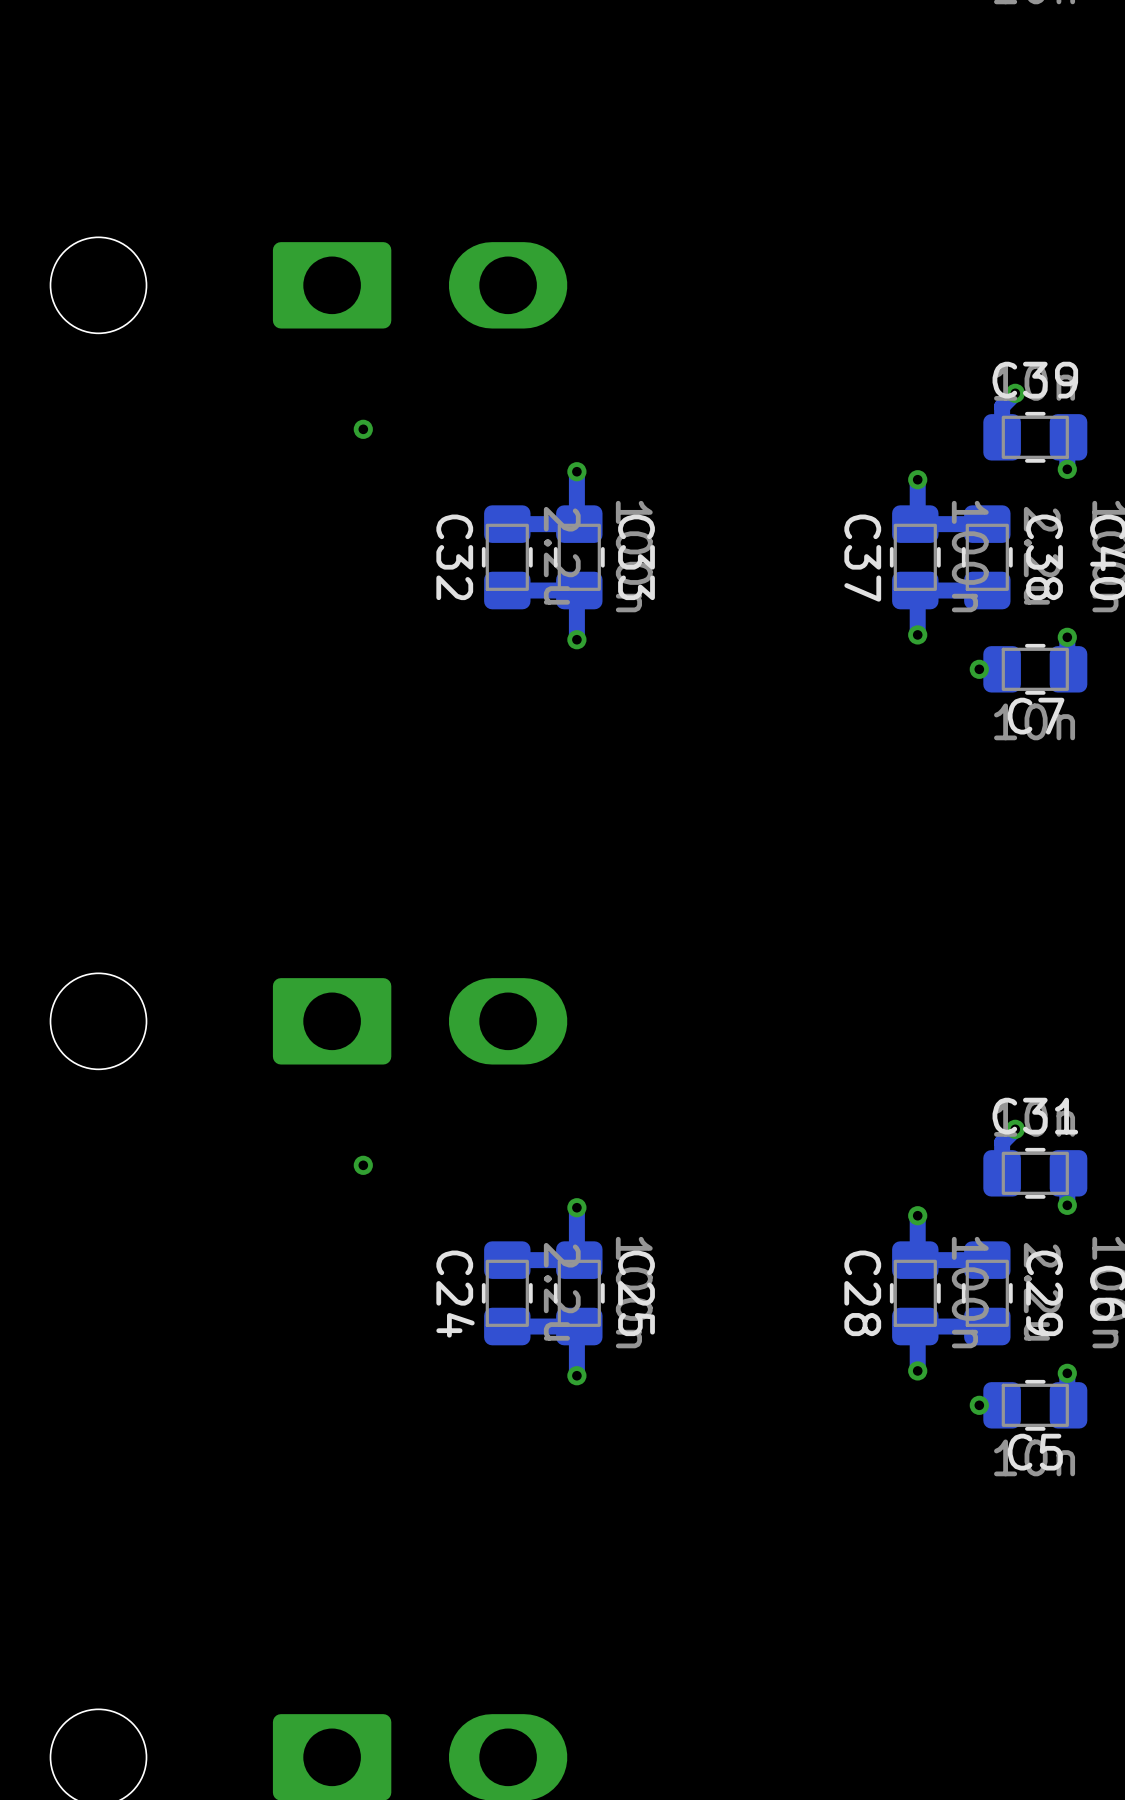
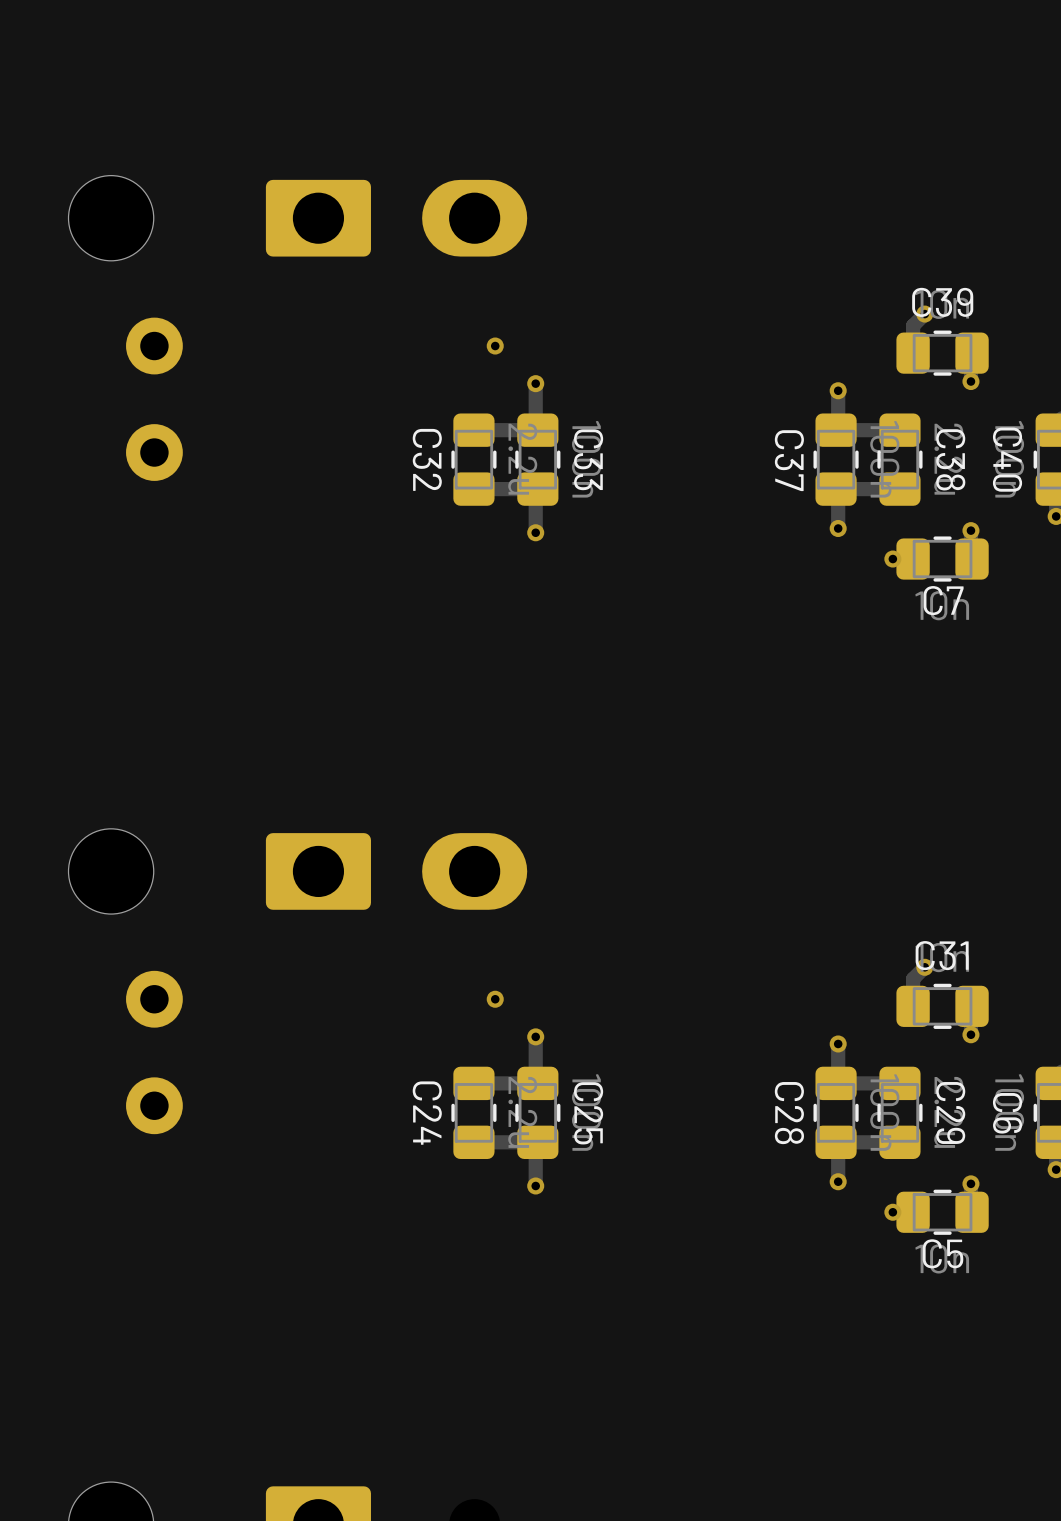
part: none -> (154, 346)
via position: (363, 429) -> (495, 346)
part: none -> (154, 452)
part: none -> (154, 999)
via position: (363, 1165) -> (495, 999)
part: none -> (154, 1105)

